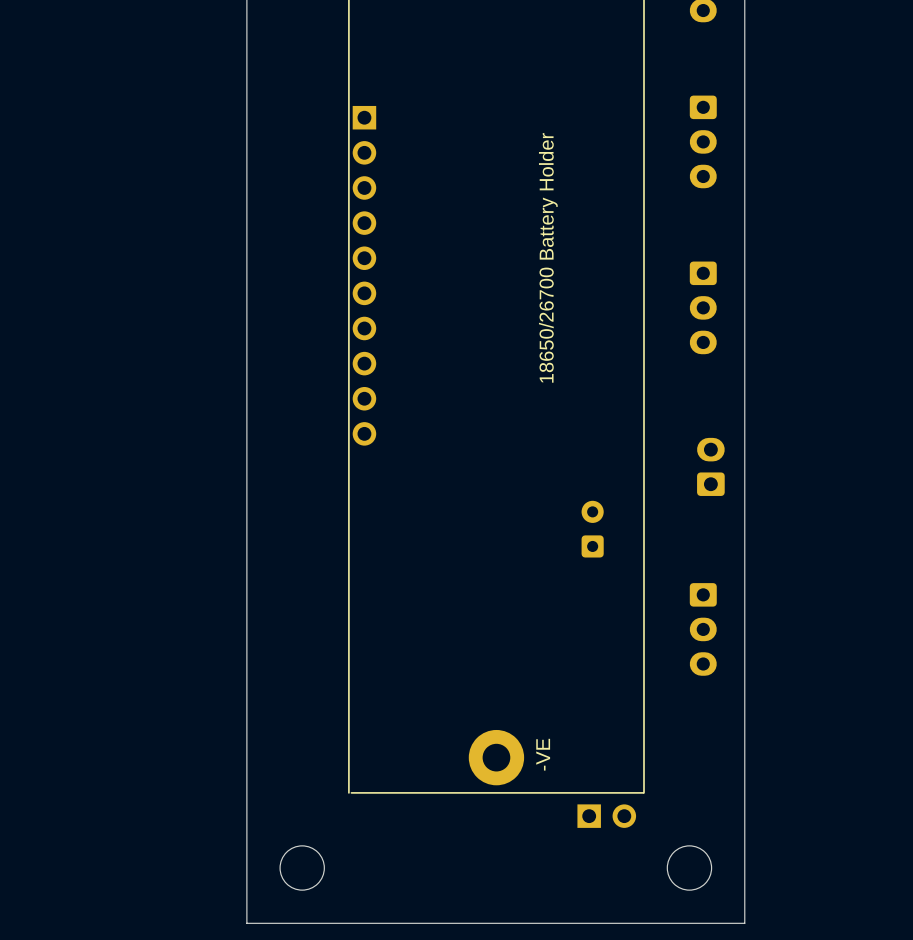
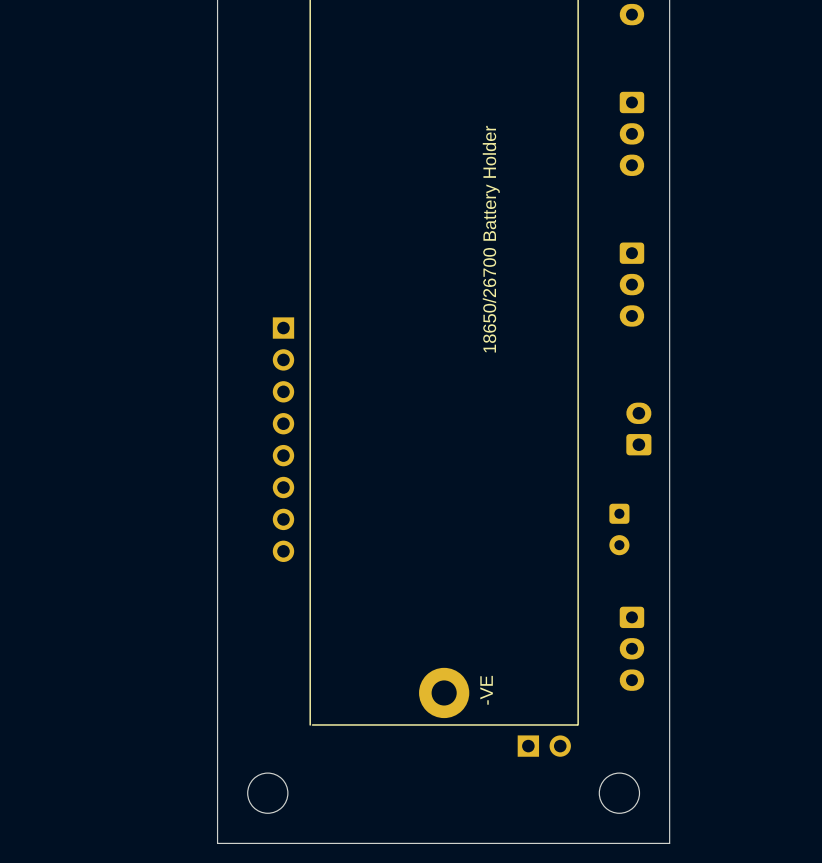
part: (364, 275) -> none
part: none -> (283, 439)
part rotation: 0° (592, 529) -> 180° (619, 529)
part position: (592, 529) -> (619, 529)
part position: (703, 629) -> (631, 648)

